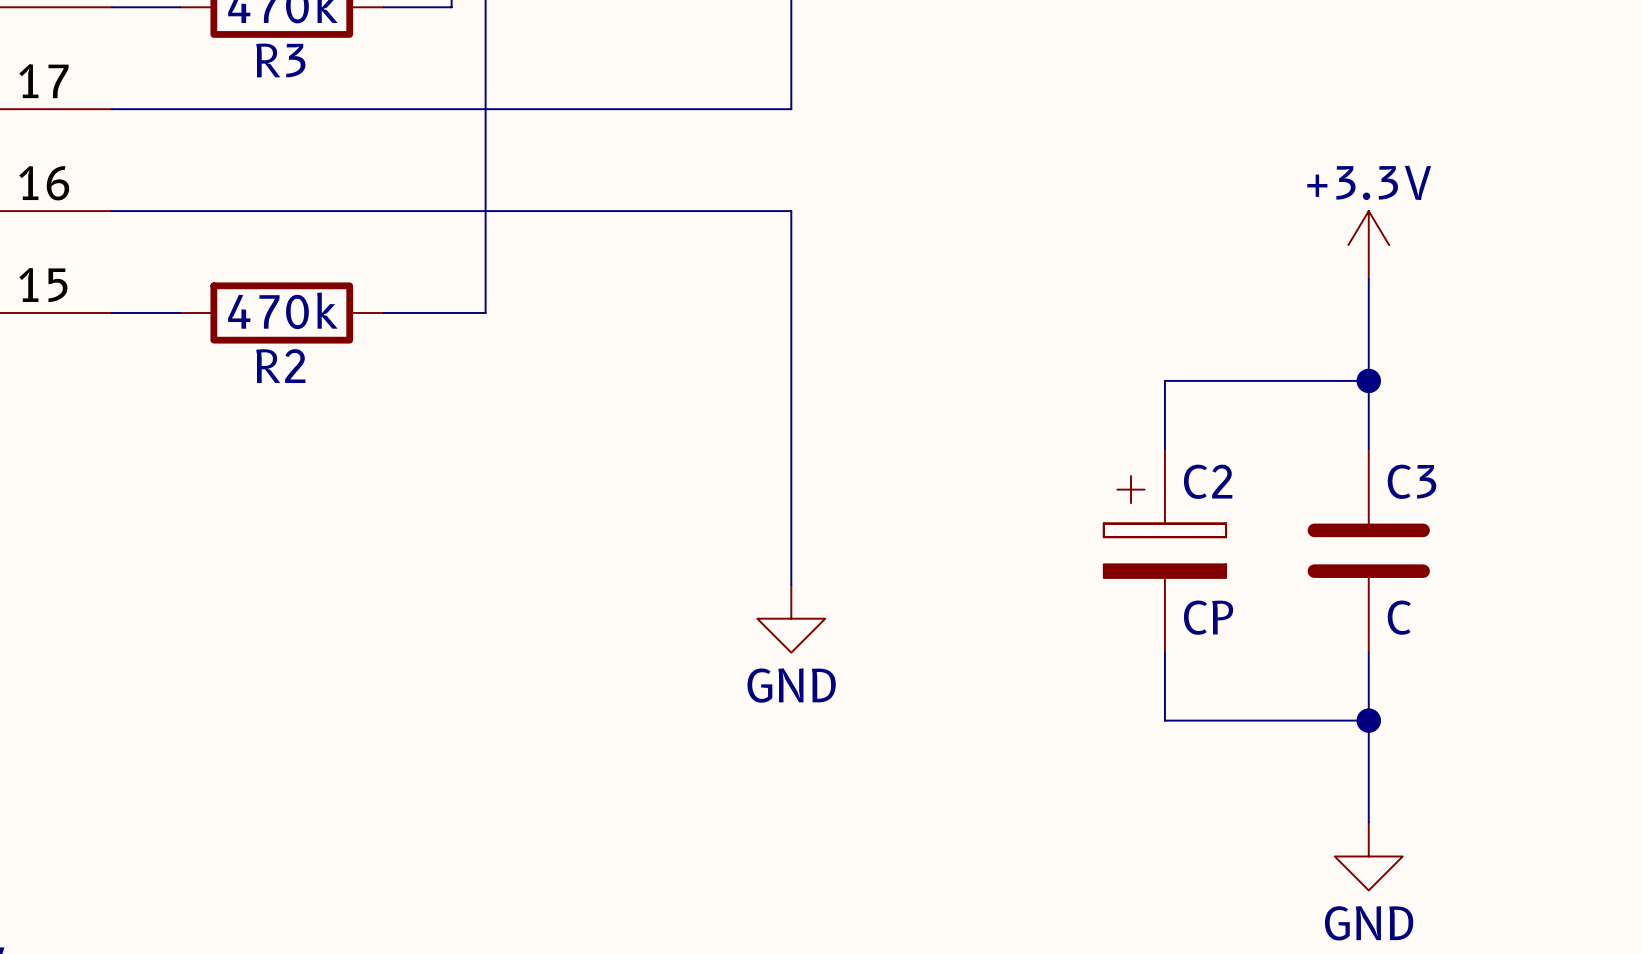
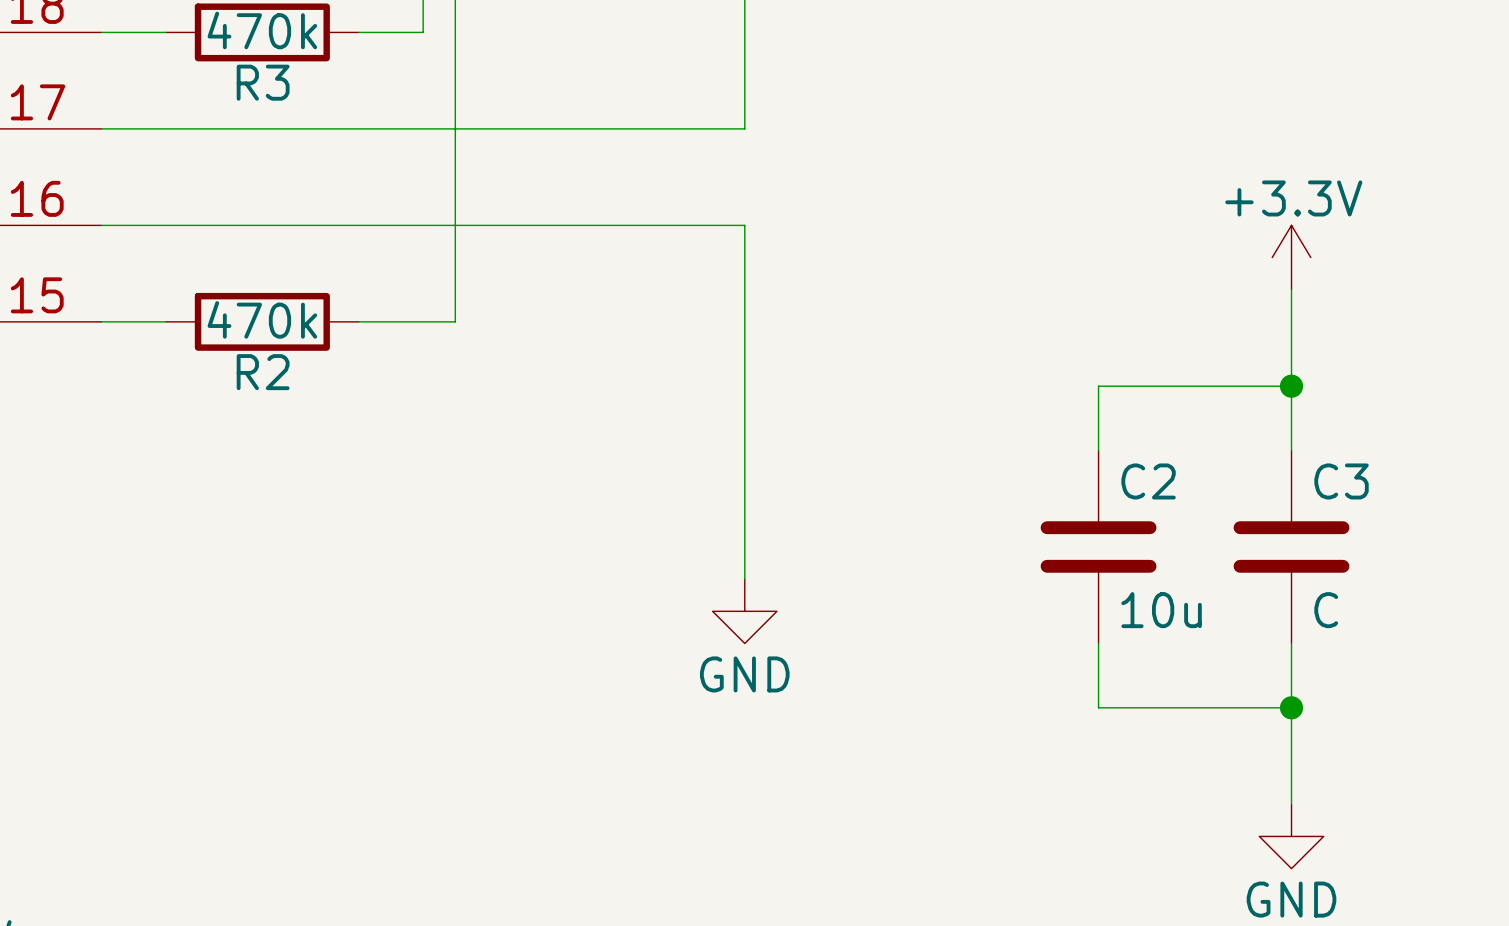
C2 symbol: [1103, 448, 1227, 653] -> [1040, 450, 1157, 644]
C2 value: CP (1208, 617) -> 10u (1161, 610)

